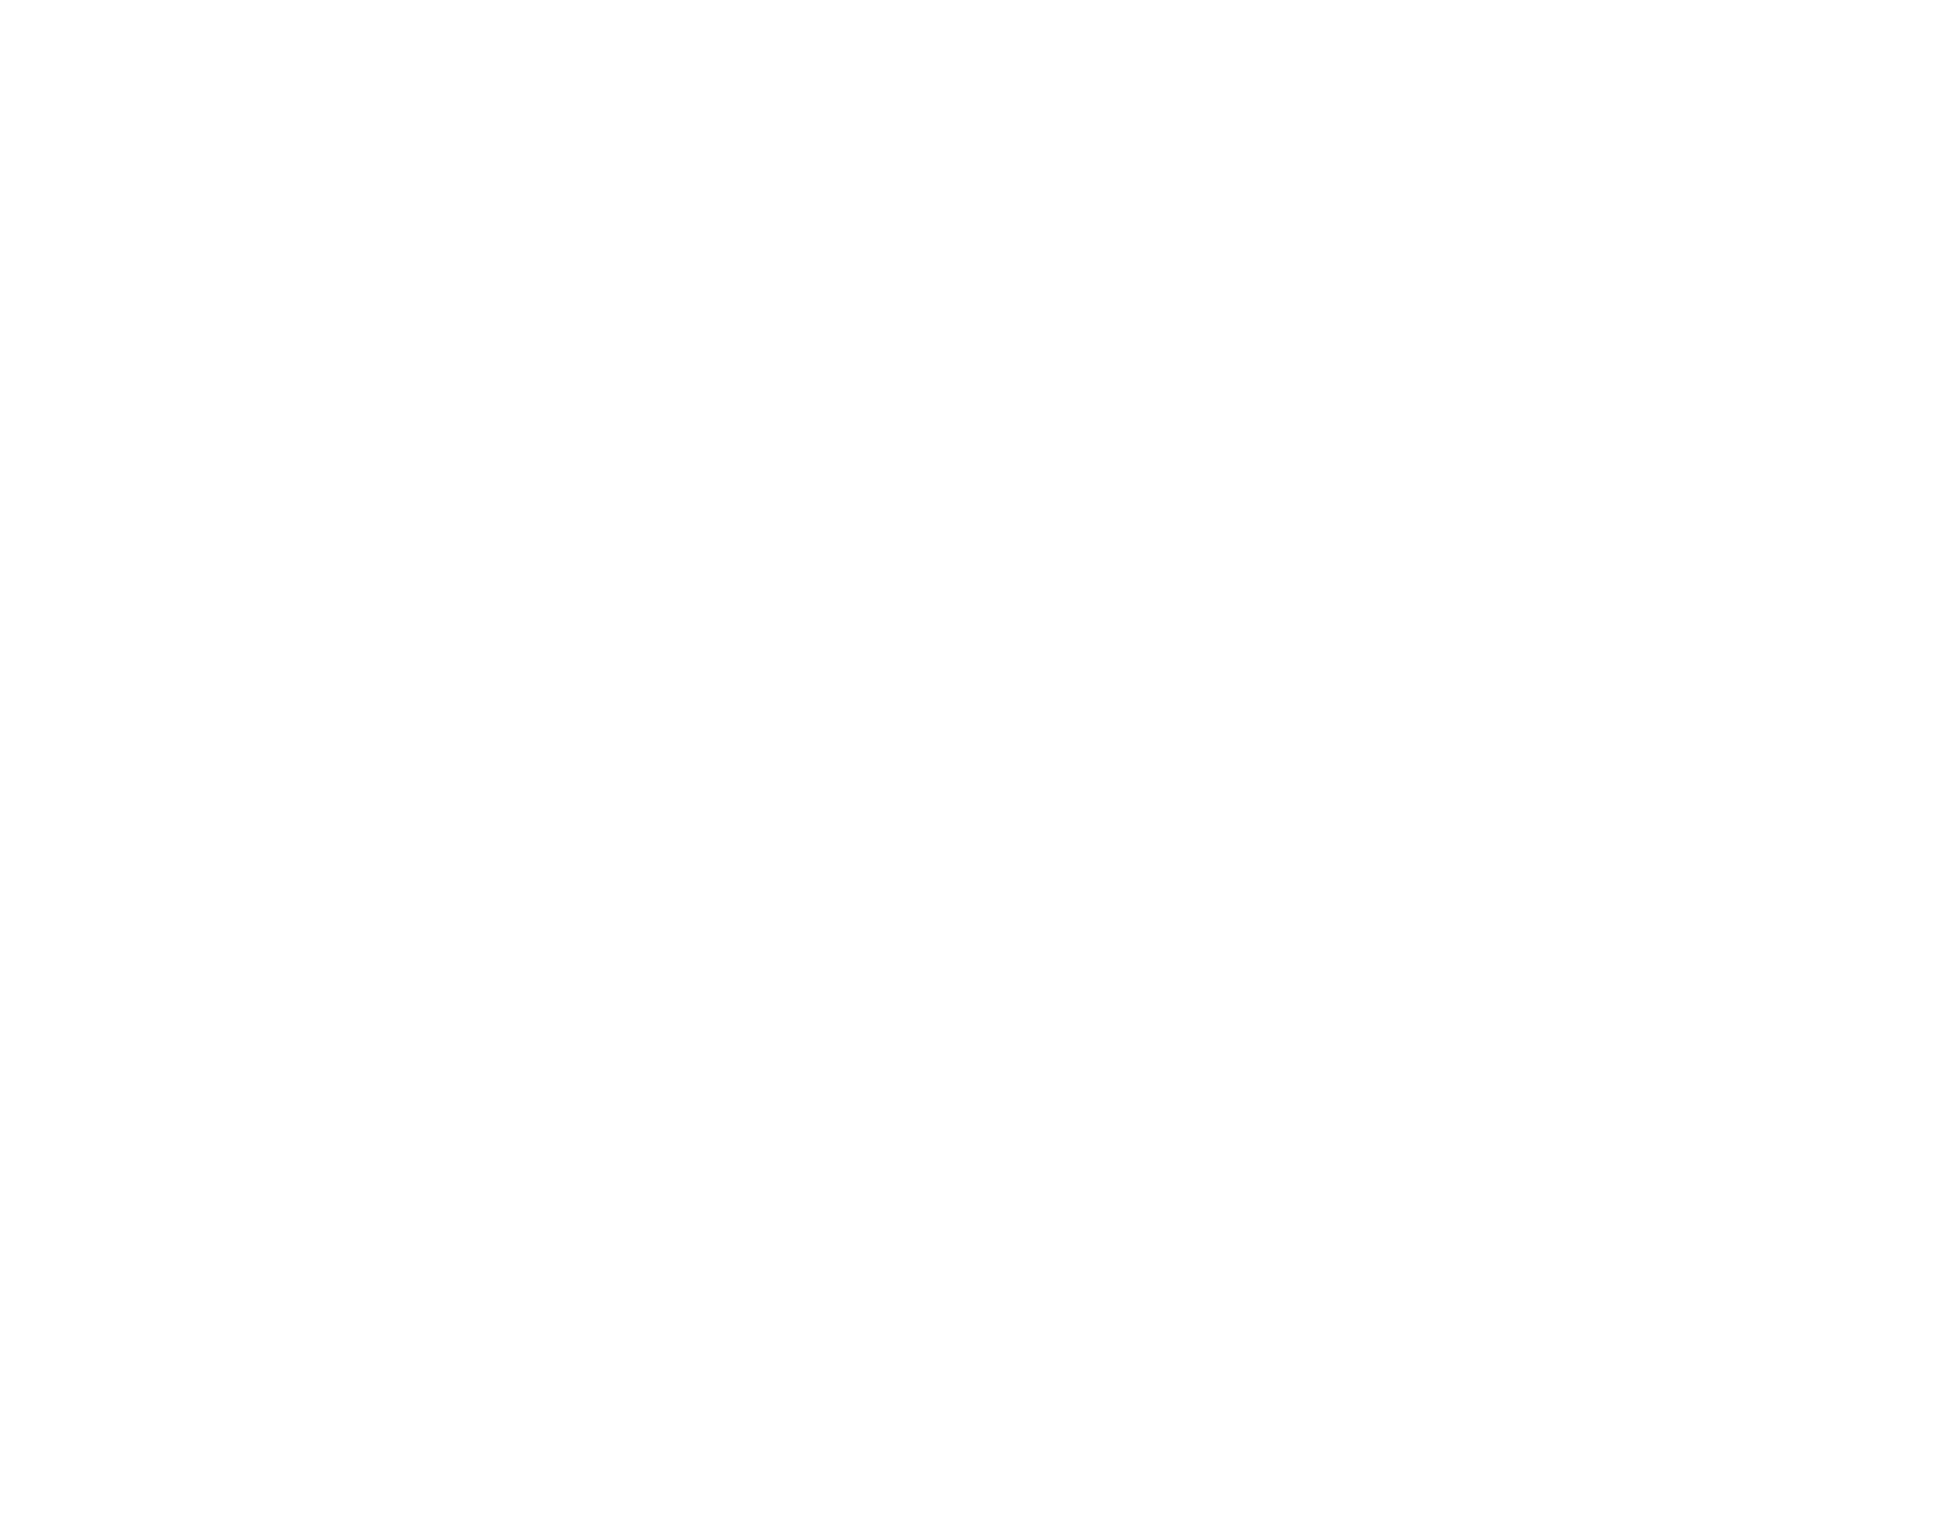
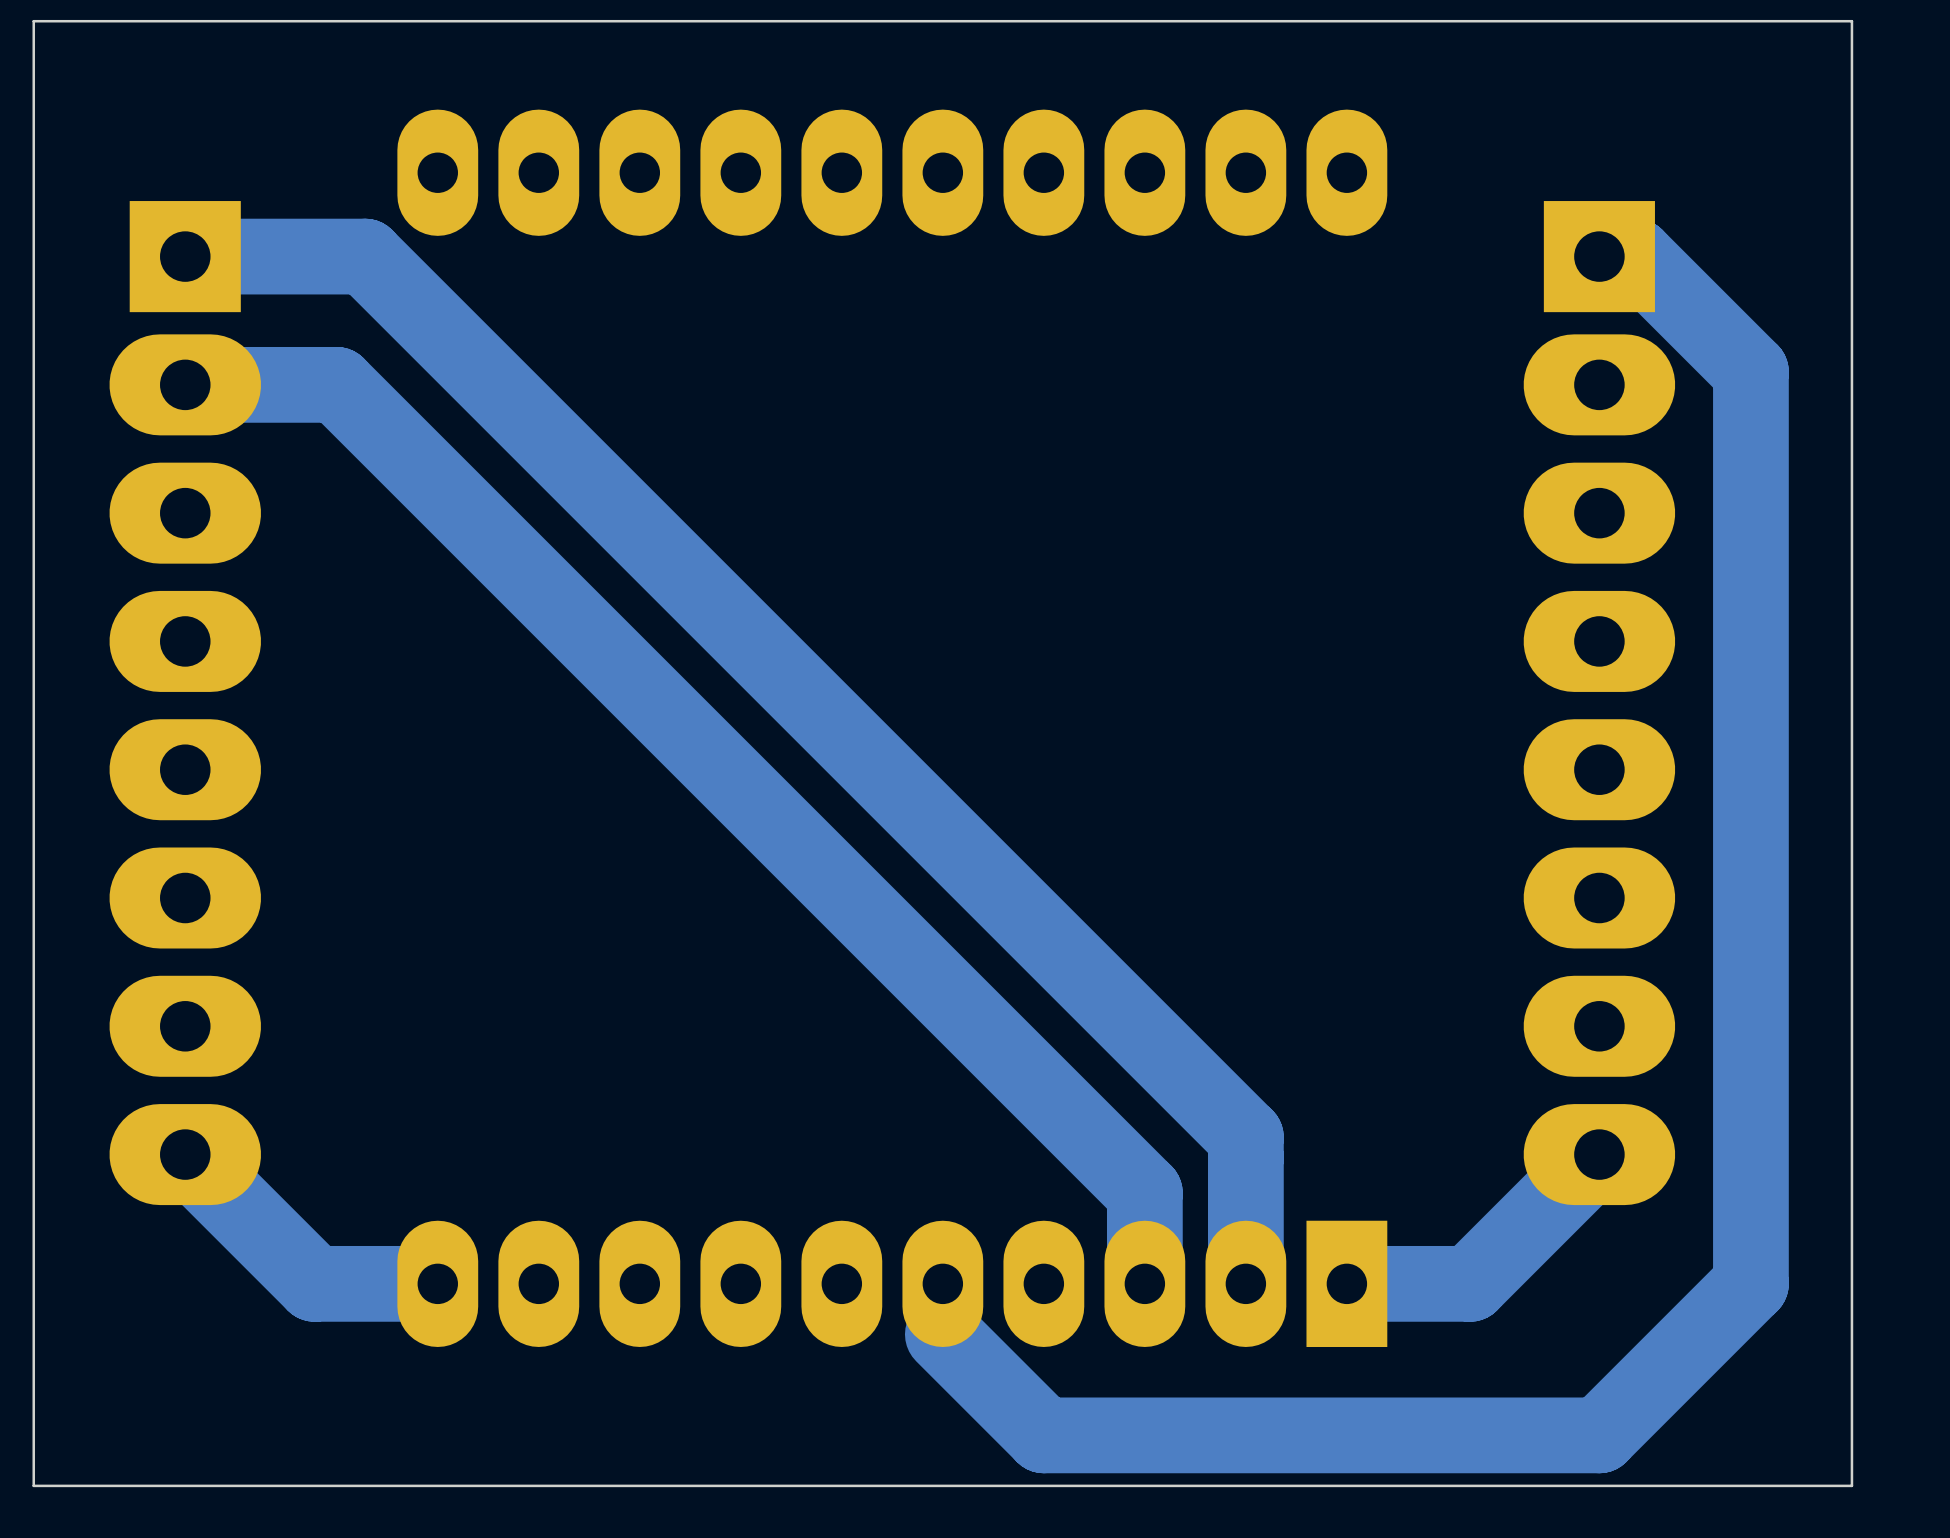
board edge: none -> (1851, 21) (33, 21) (33, 1485) (1851, 1485) (1851, 21)
part: none -> (892, 172)
bottom track: none -> (185, 256) (365, 256) (1245, 1137) (1245, 1283)
bottom track: none -> (1599, 256) (1635, 256) (1750, 371) (1750, 1283) (1599, 1435) (1043, 1435) (942, 1334)
bottom track: none -> (185, 384) (336, 384) (1144, 1192) (1144, 1283)
part: none -> (185, 703)
part: none -> (1599, 703)
bottom track: none -> (185, 1154) (314, 1283) (437, 1283)
bottom track: none -> (1599, 1154) (1470, 1283) (1346, 1283)
part: none -> (892, 1283)

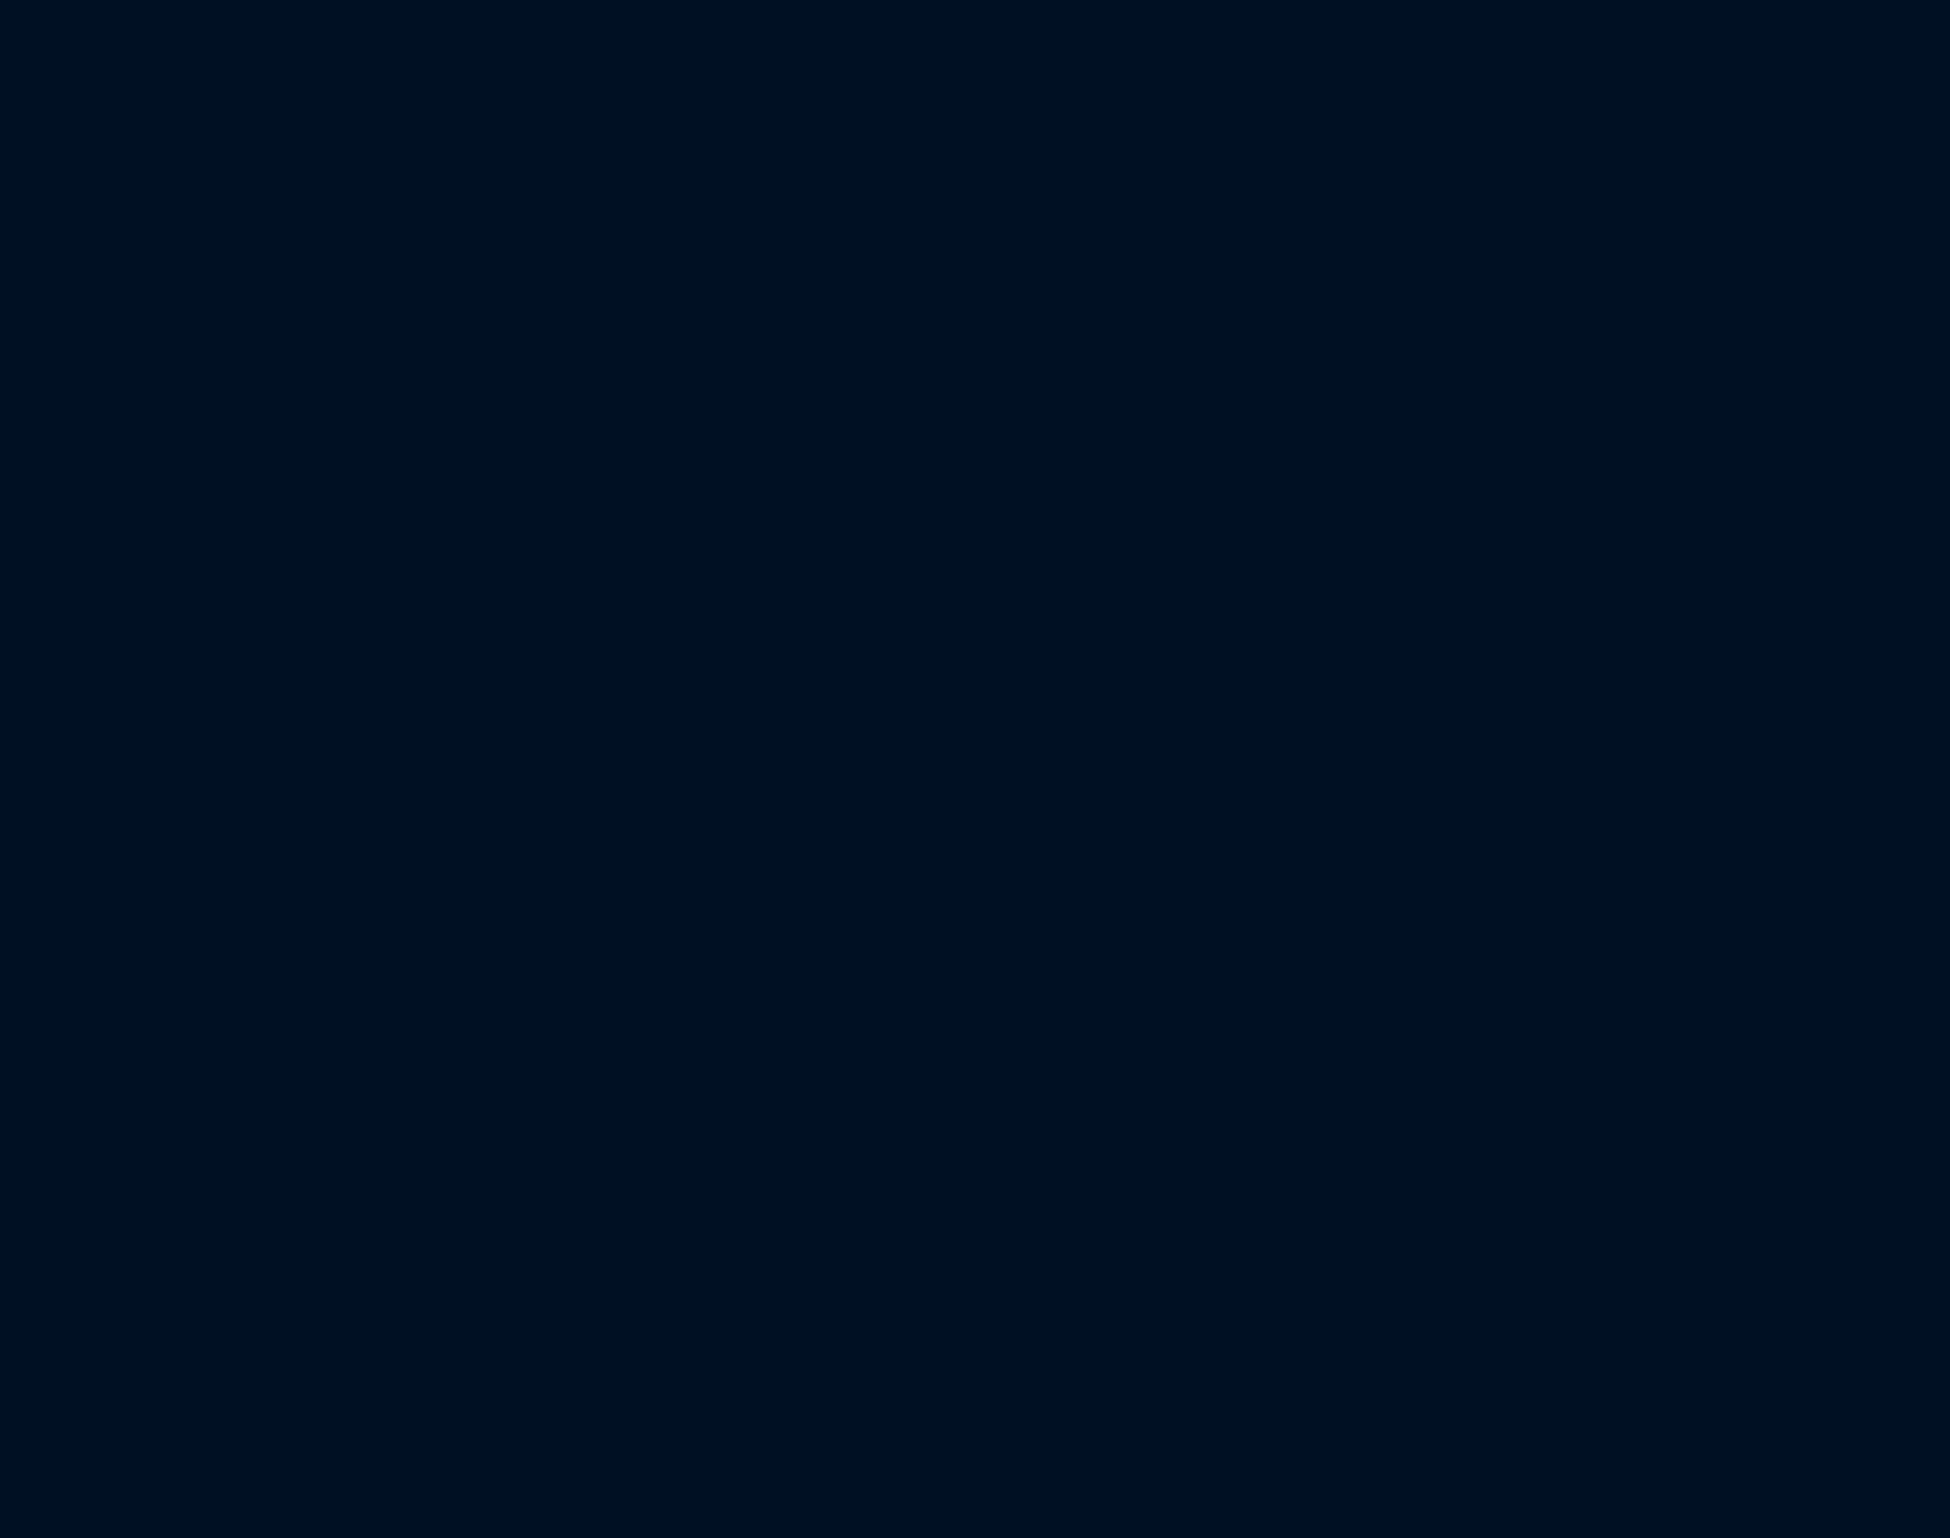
board edge: (1851, 21) (33, 21) (33, 1485) (1851, 1485) (1851, 21) -> none
part: (892, 172) -> none
bottom track: (185, 256) (365, 256) (1245, 1137) (1245, 1283) -> none
bottom track: (1599, 256) (1635, 256) (1750, 371) (1750, 1283) (1599, 1435) (1043, 1435) (942, 1334) -> none
bottom track: (185, 384) (336, 384) (1144, 1192) (1144, 1283) -> none
part: (185, 703) -> none
part: (1599, 703) -> none
bottom track: (185, 1154) (314, 1283) (437, 1283) -> none
bottom track: (1599, 1154) (1470, 1283) (1346, 1283) -> none
part: (892, 1283) -> none

